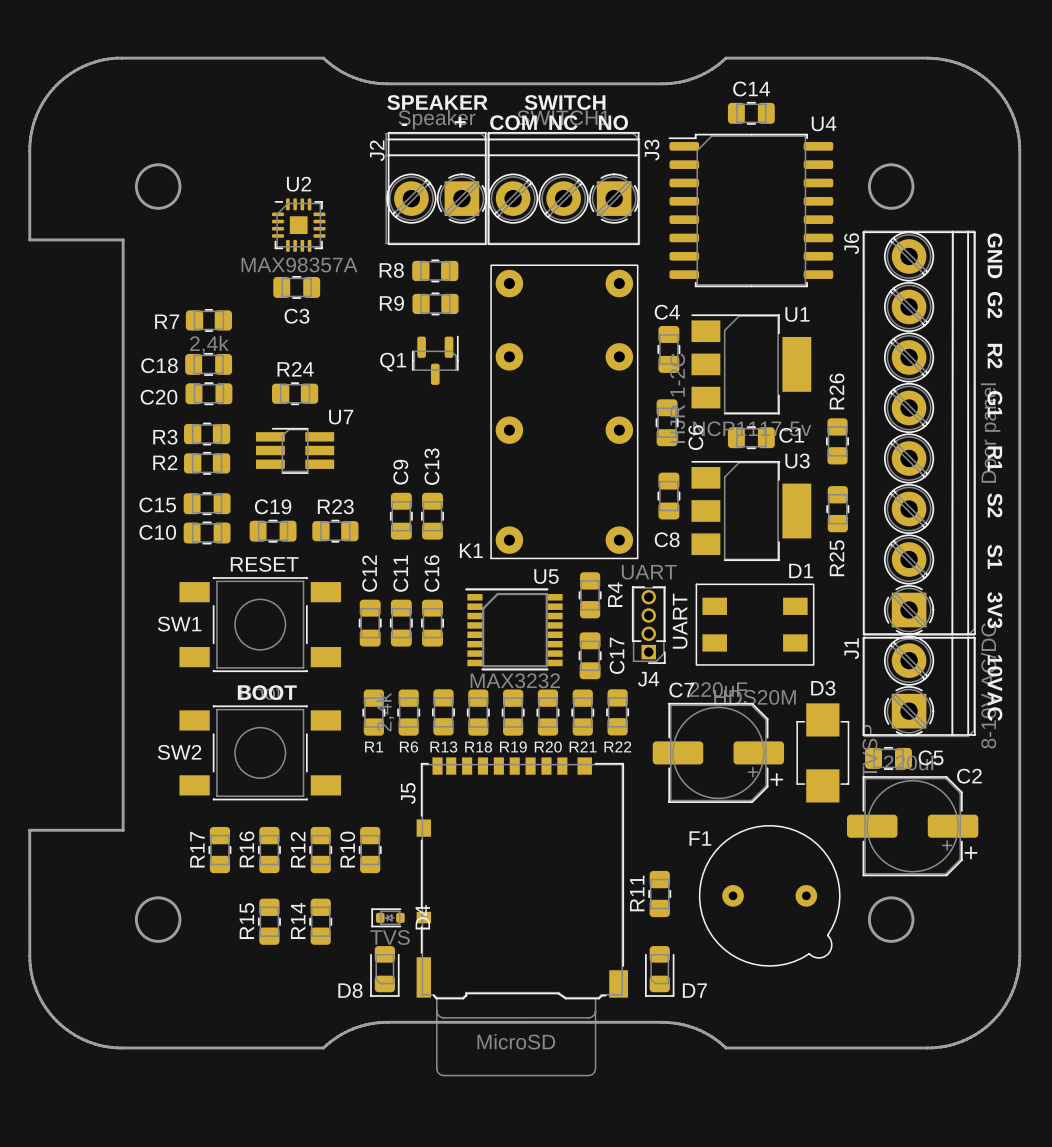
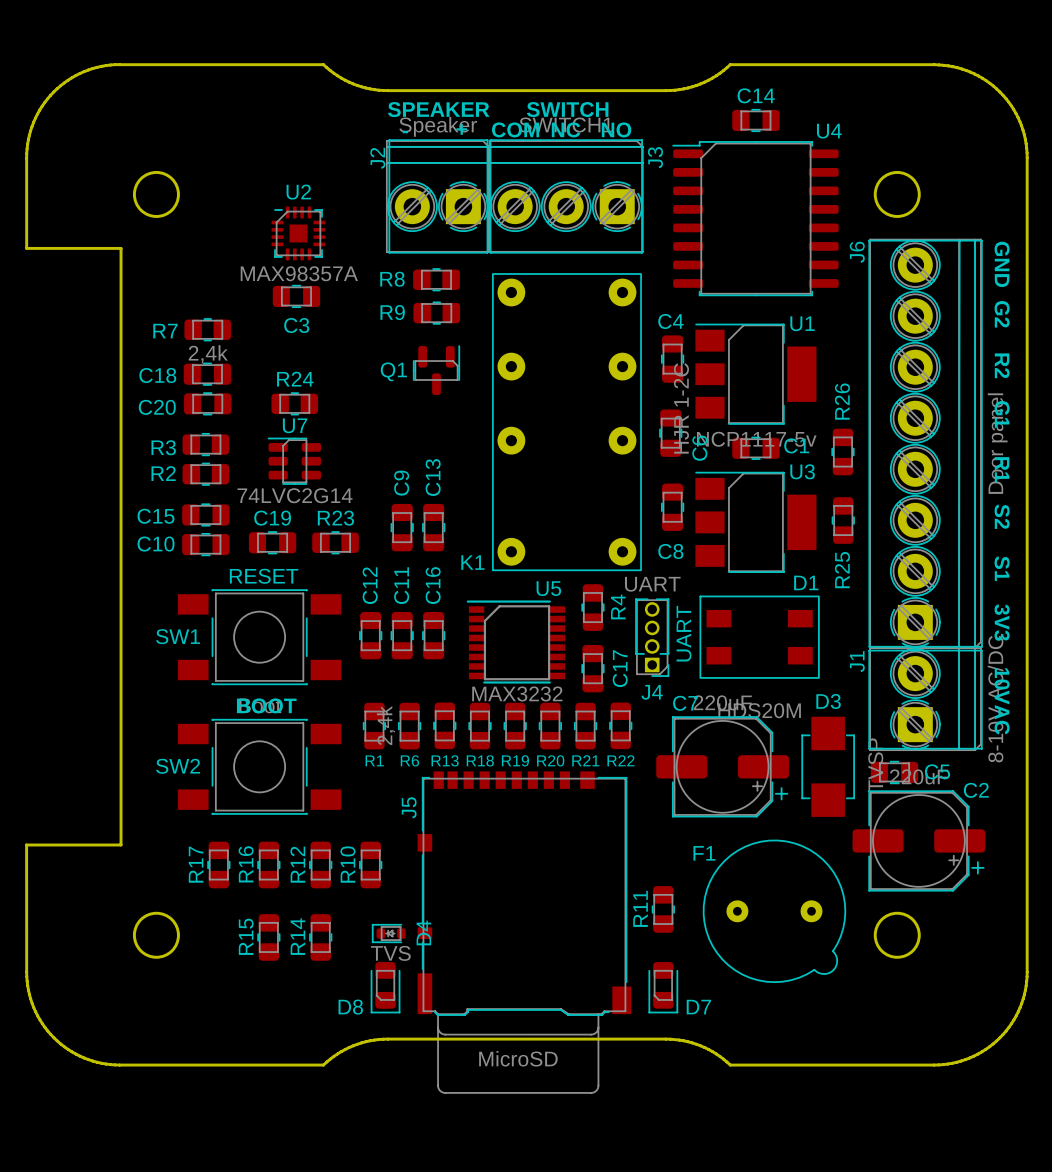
U7 name position: U7 (341, 417) -> U7 (295, 425)
U7 footprint: [255, 427, 335, 474] -> [267, 437, 322, 485]
U7 value: none -> 74LVC2G14 (295, 495)

